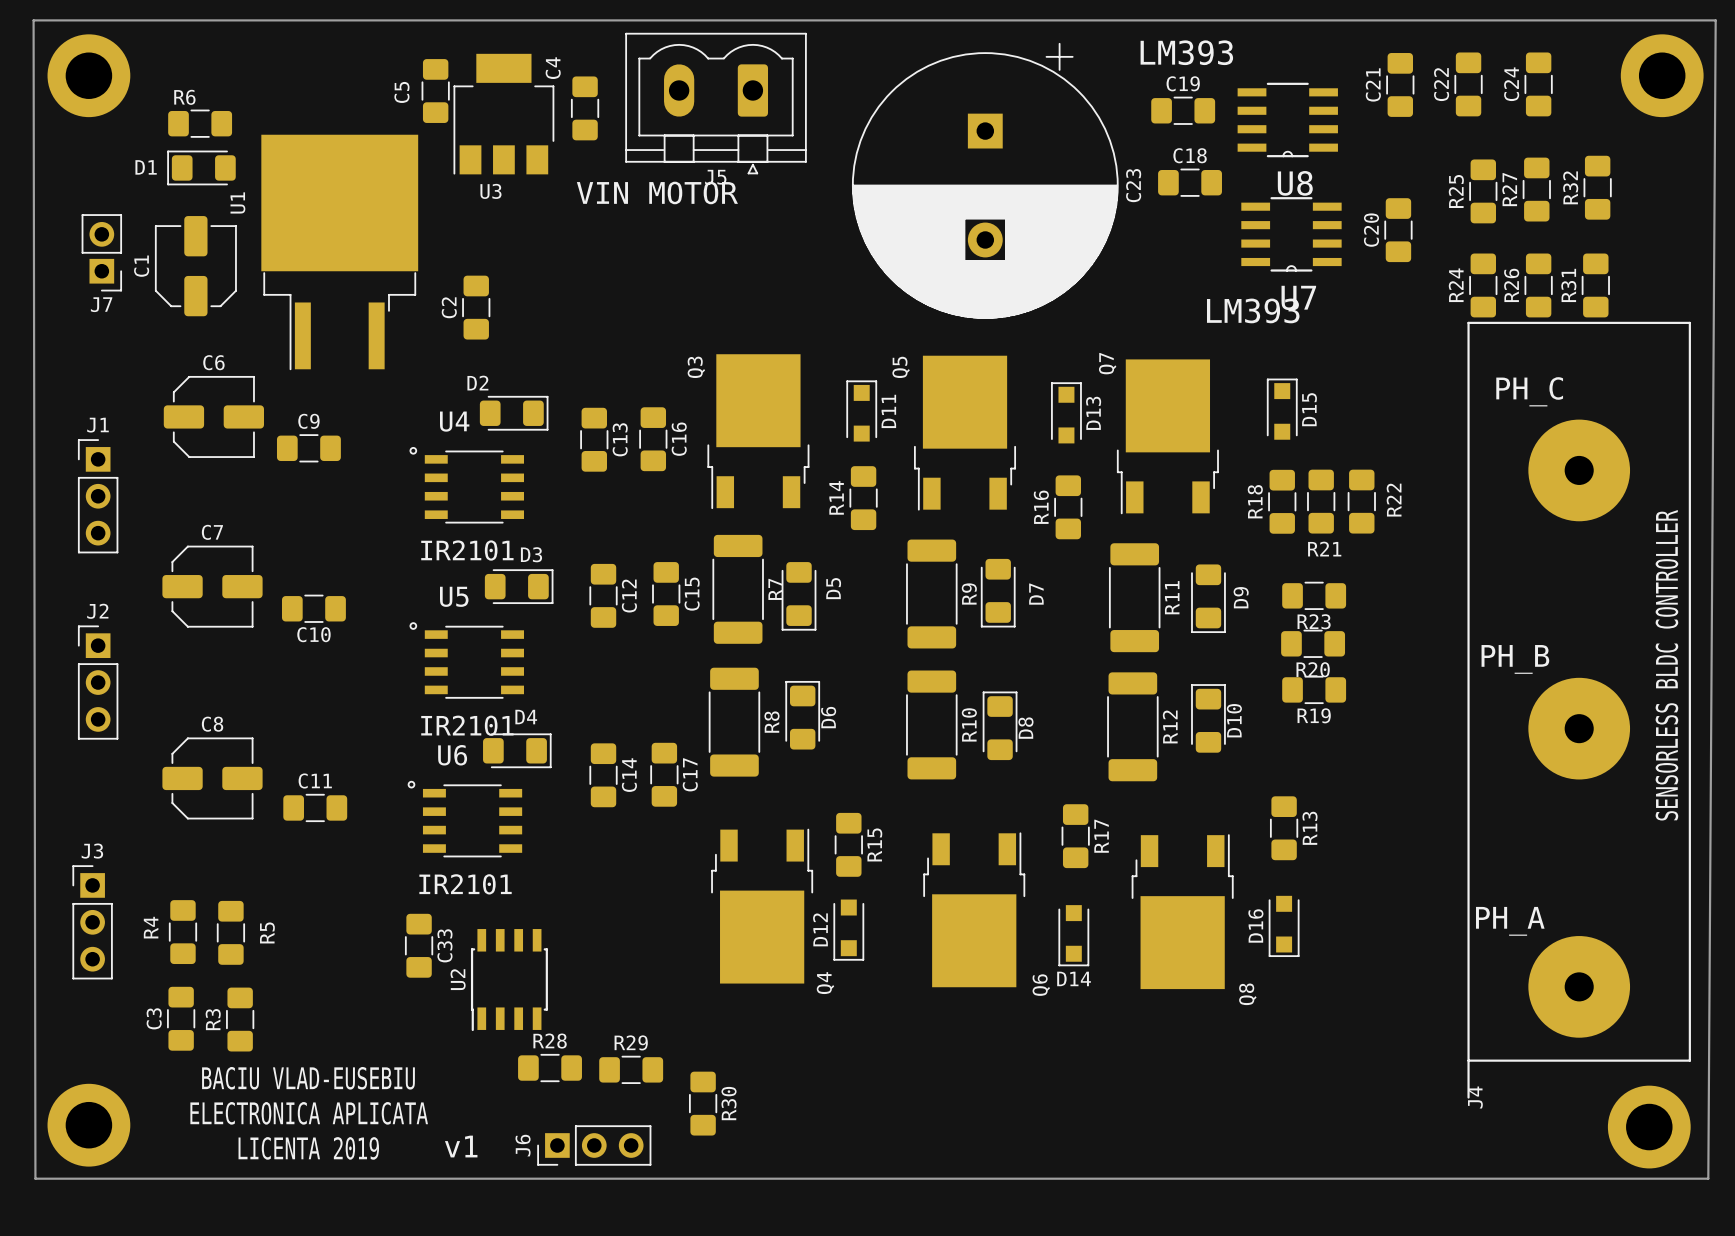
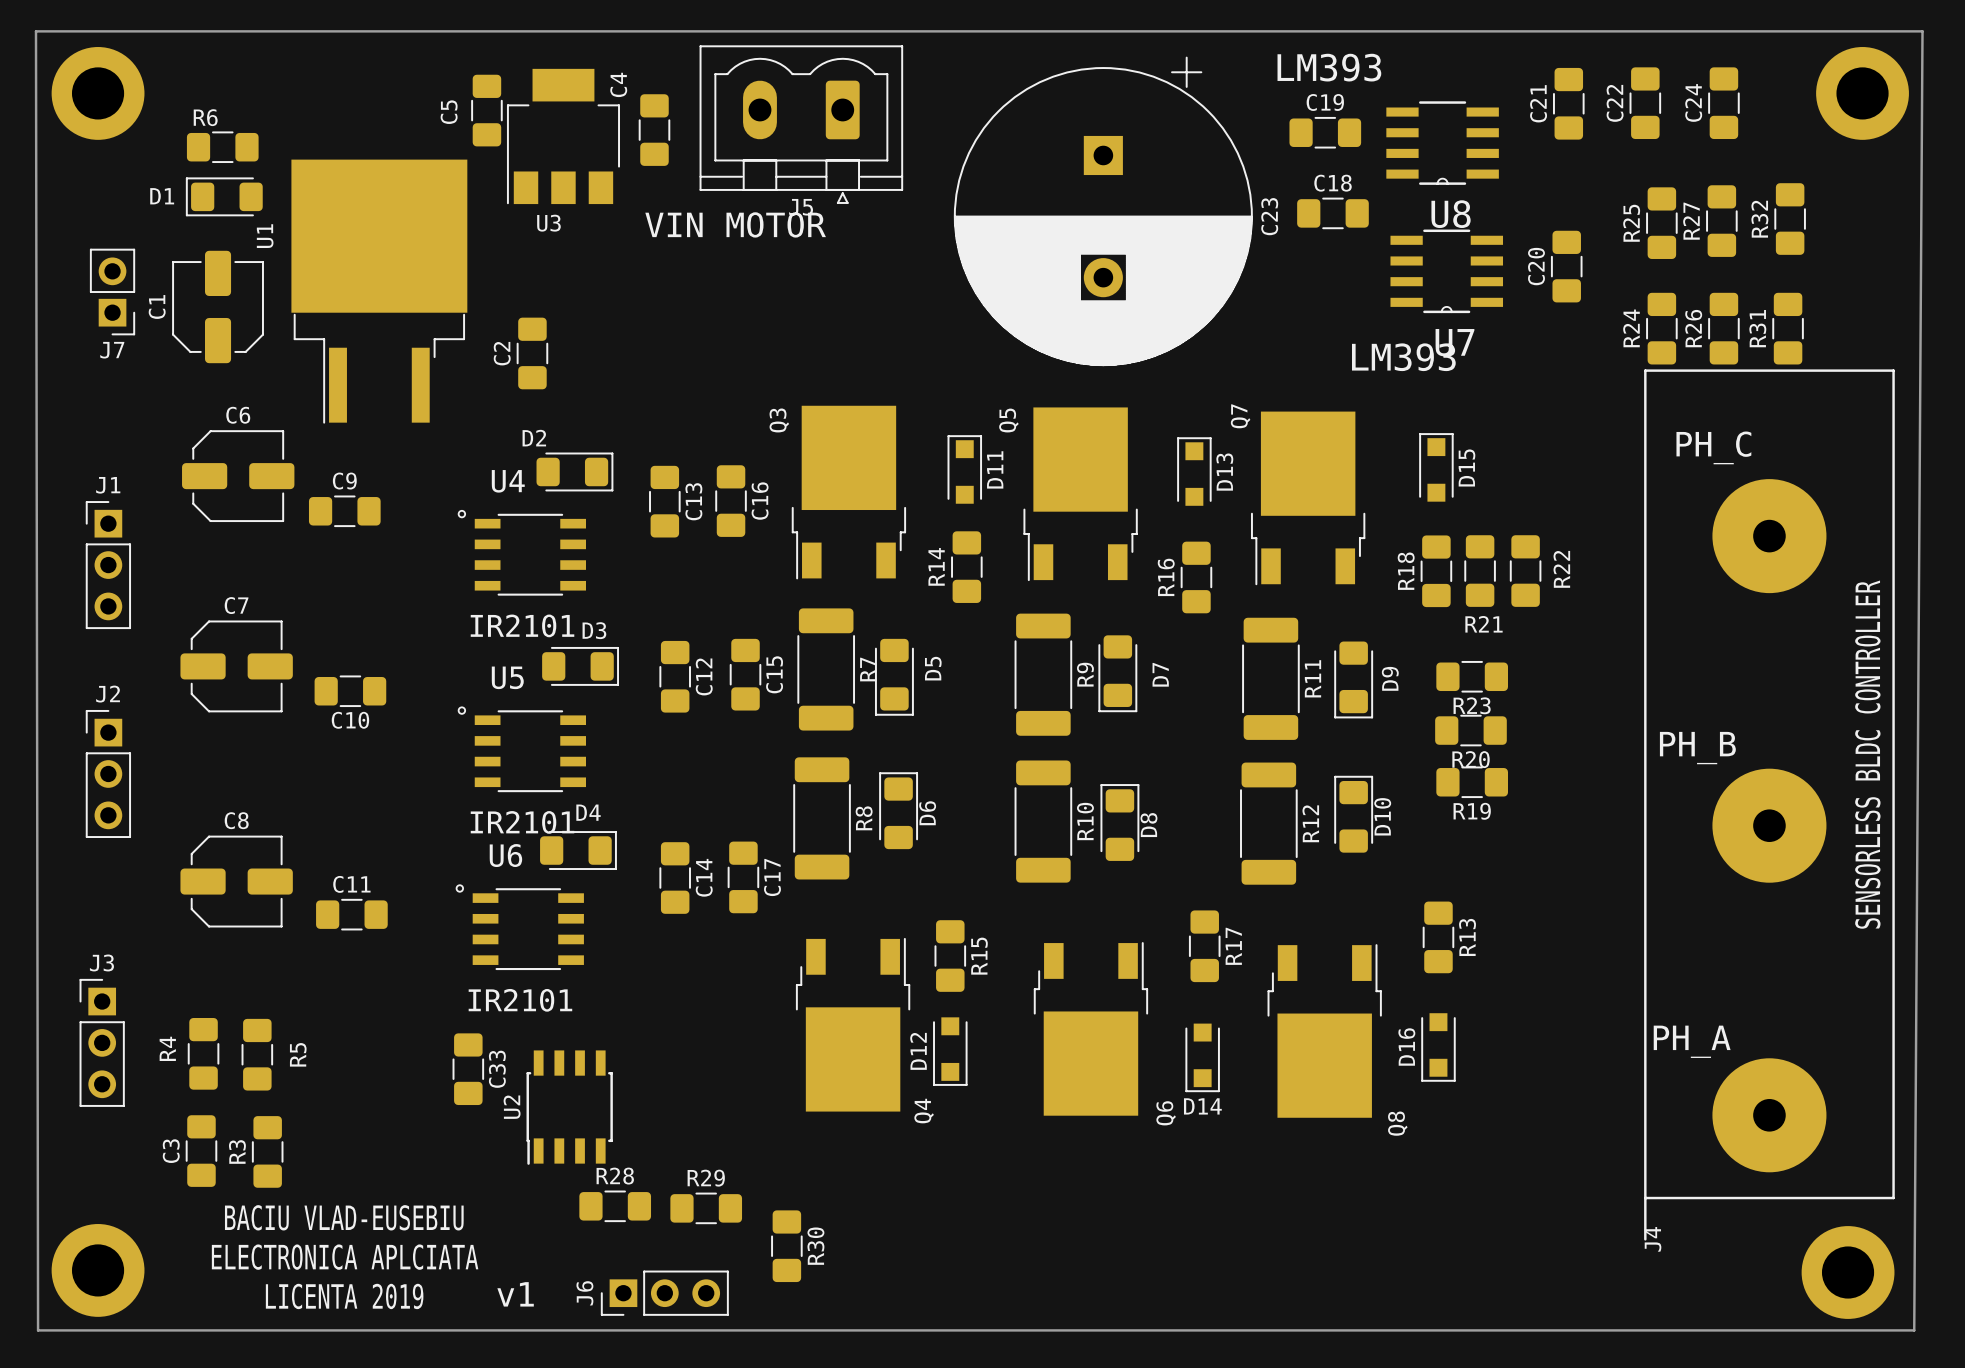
text: ELECTRONICA APLICATA (309, 1113) -> ELECTRONICA APLCIATA (345, 1257)

